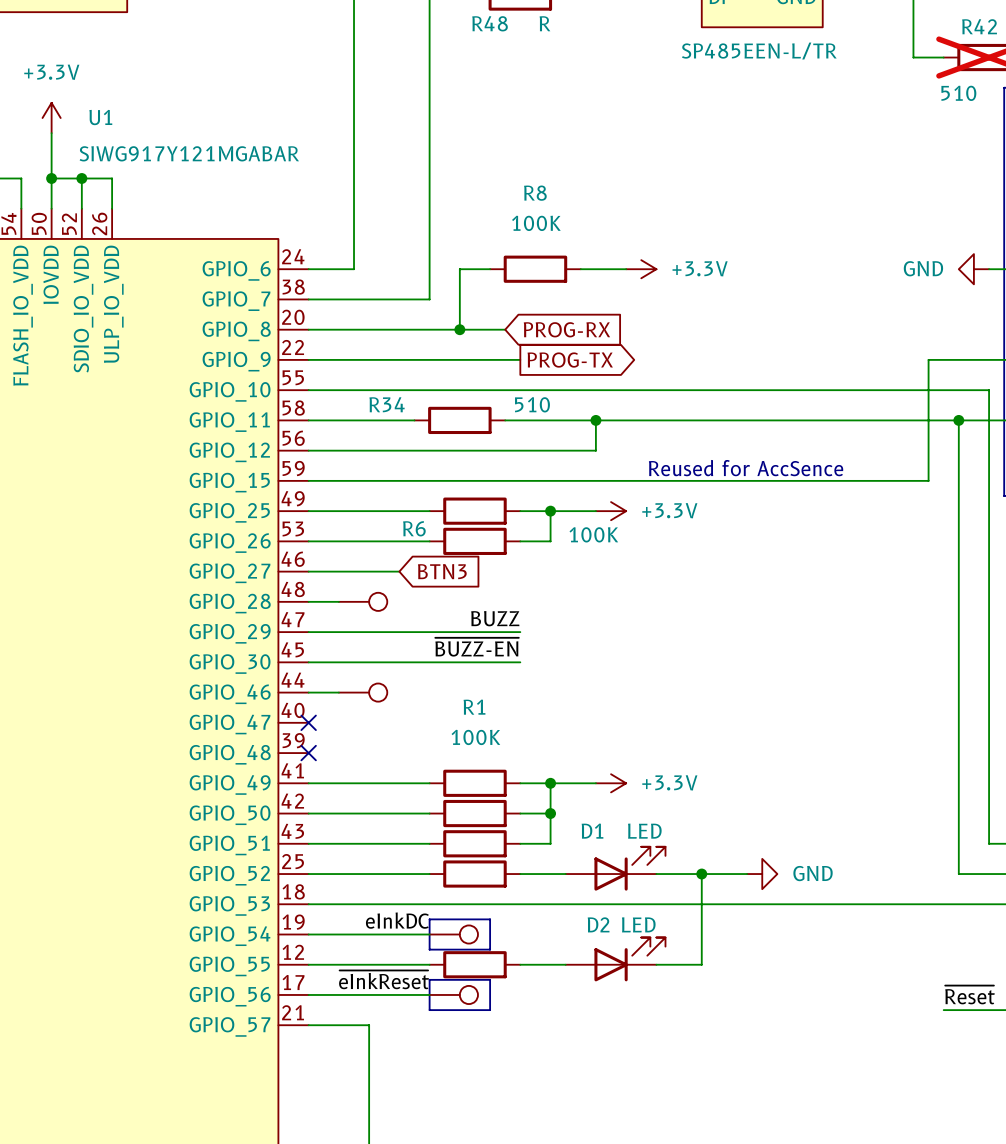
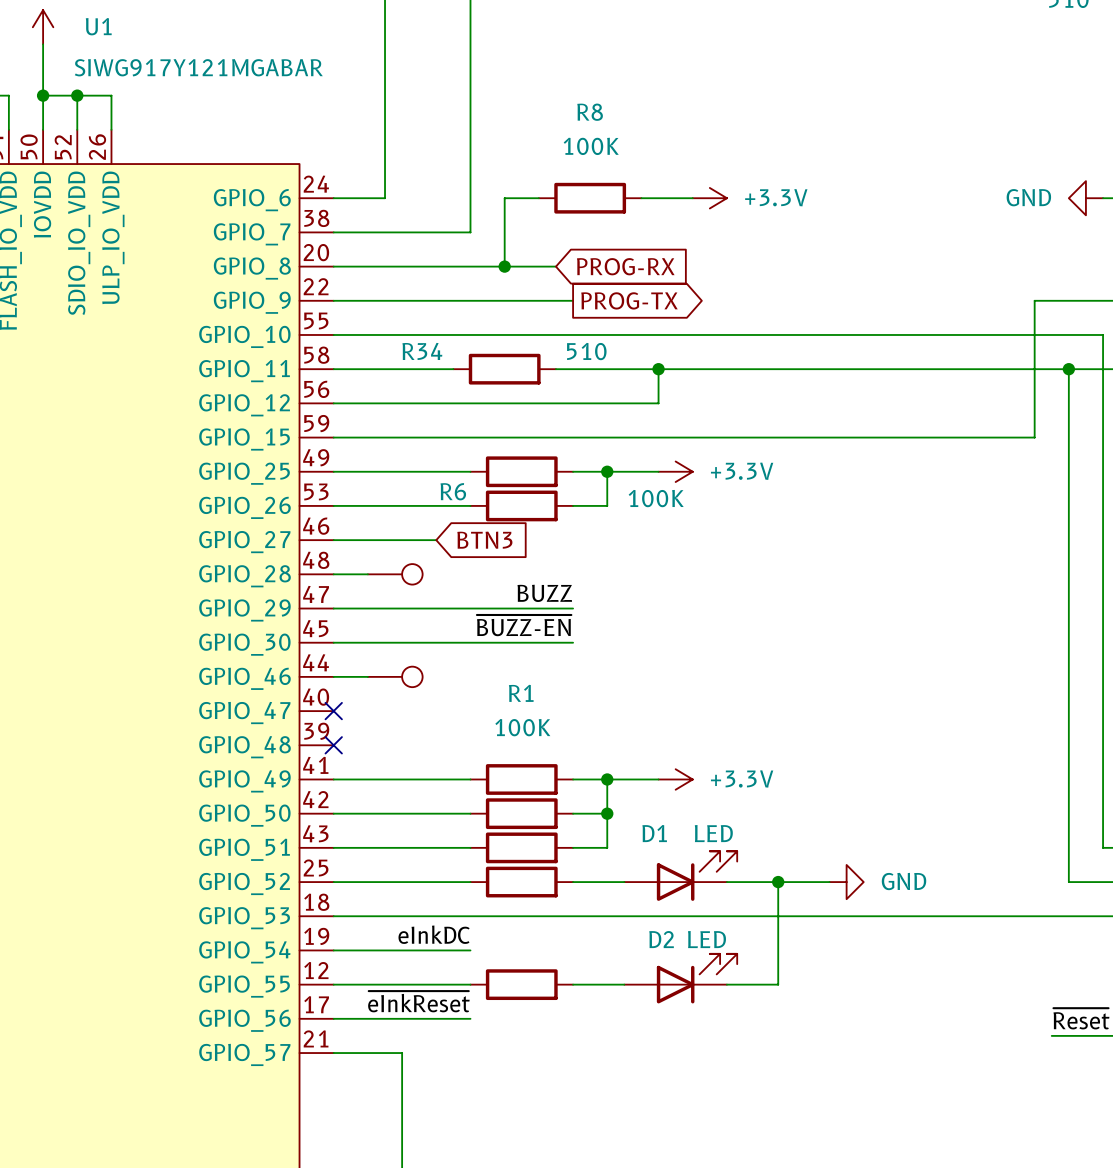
text: Reused for AccSence (746, 468) -> none
line: (429, 919) (429, 949) (490, 949) (490, 919) (429, 919) -> none
part: (453, 934) -> none
line: (429, 979) (490, 979) (490, 1010) (429, 1010) (429, 979) -> none
part: (453, 994) -> none

